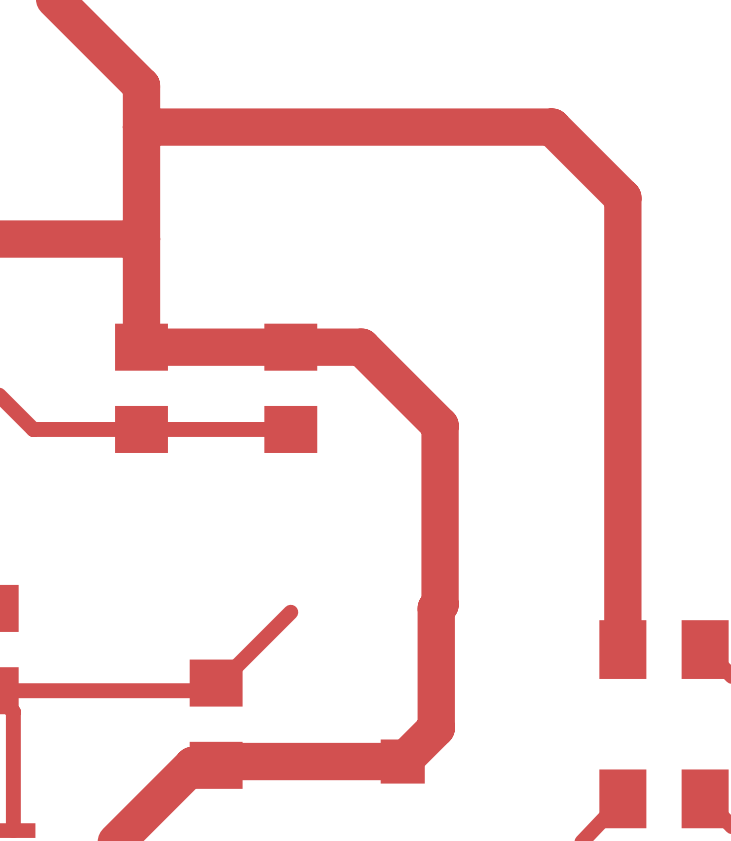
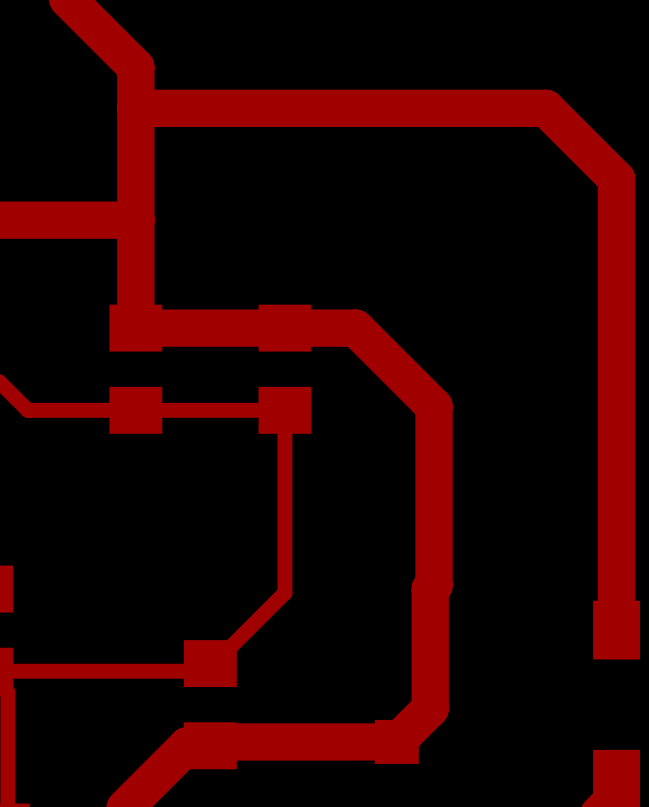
top track: none -> (284, 410) (284, 592)

